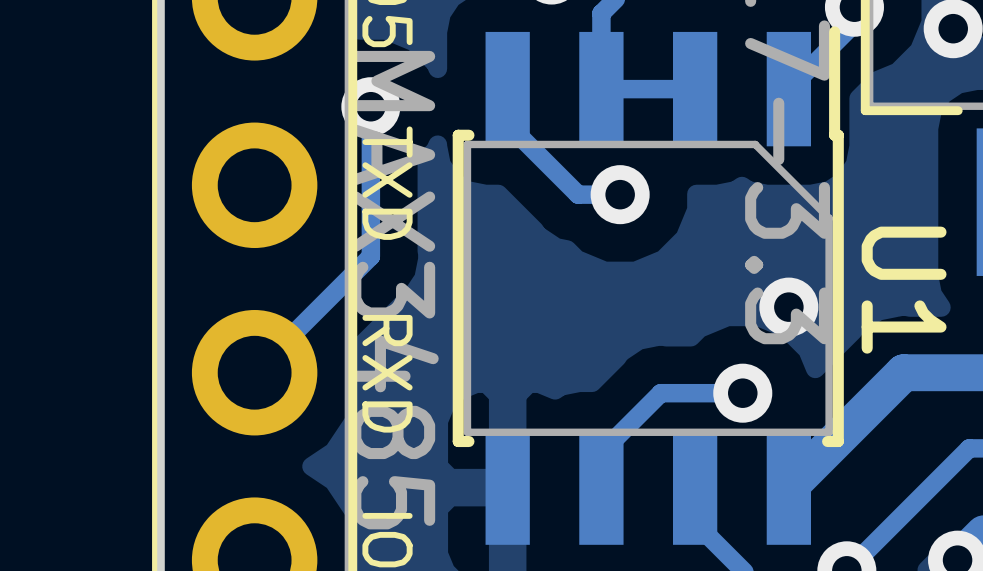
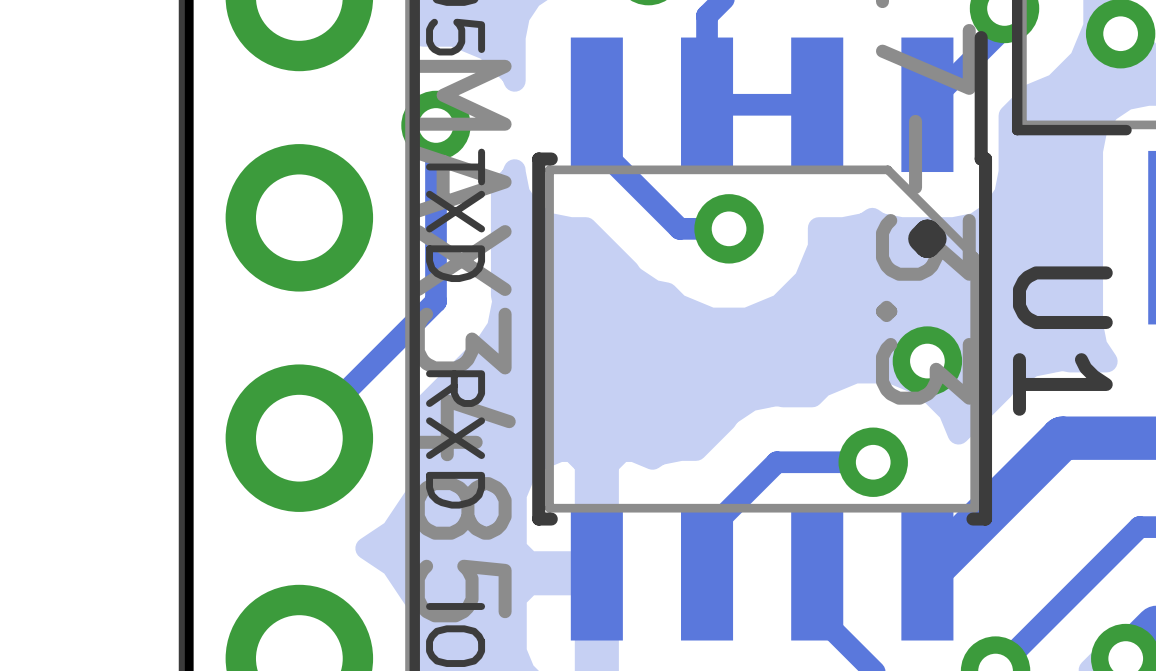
text: none -> . (927, 238)

